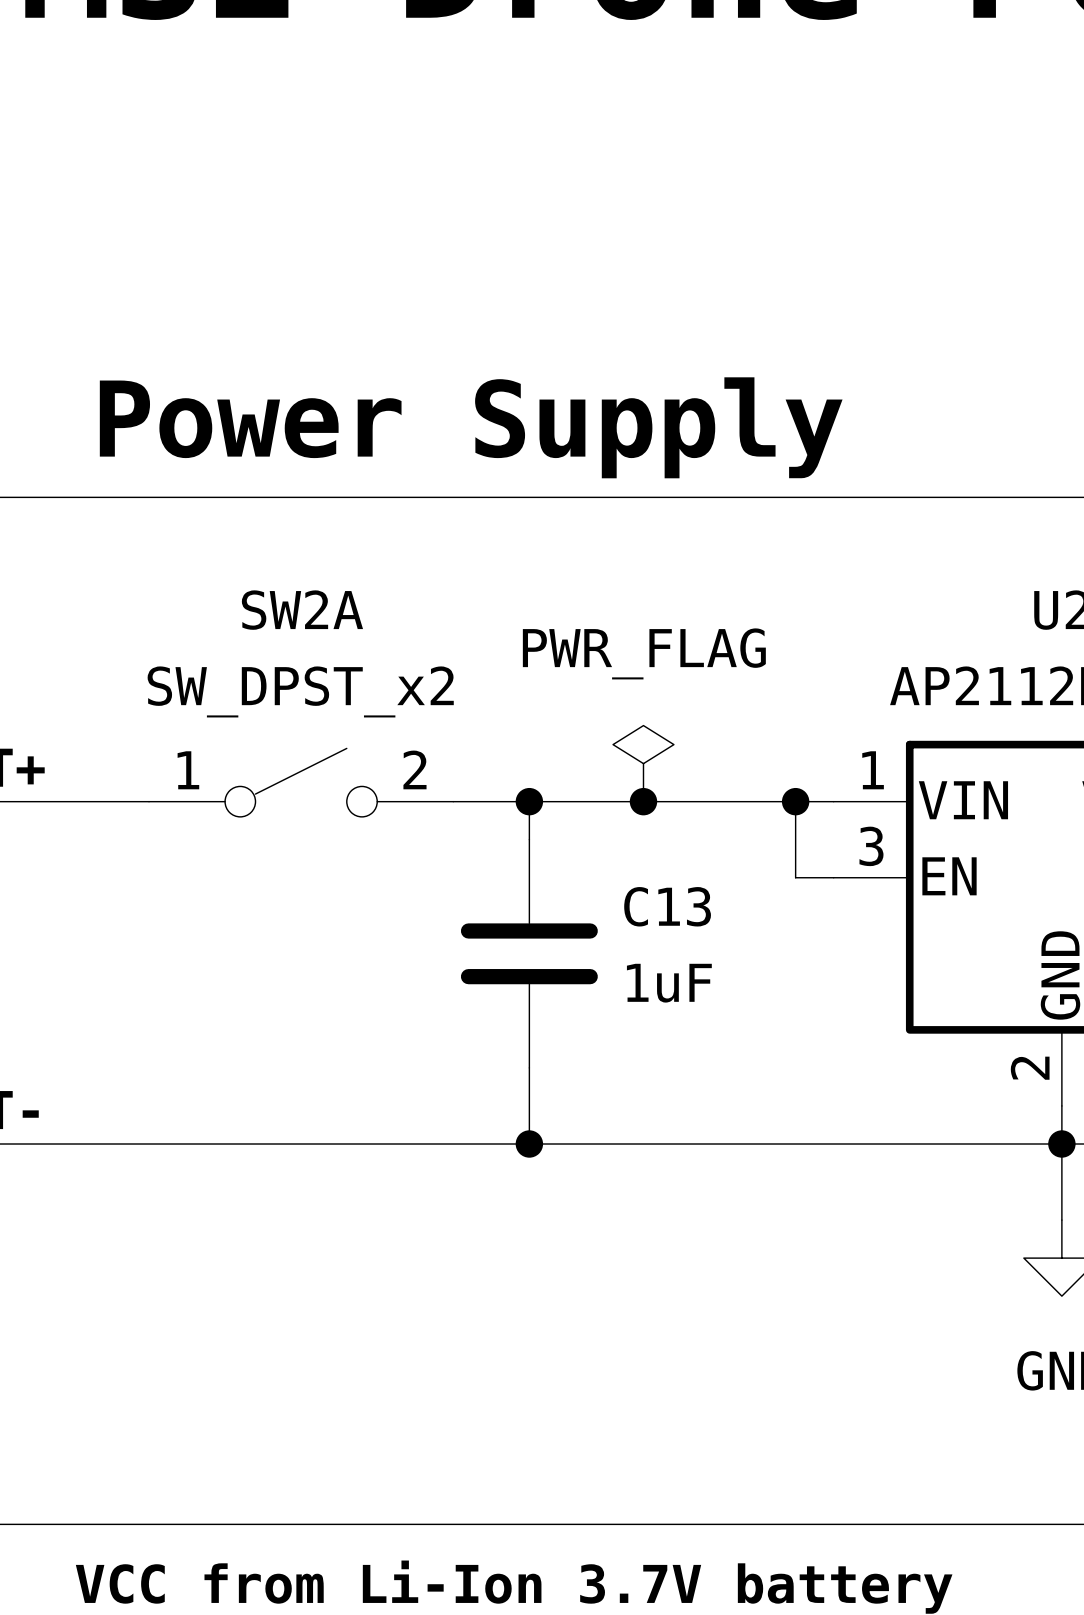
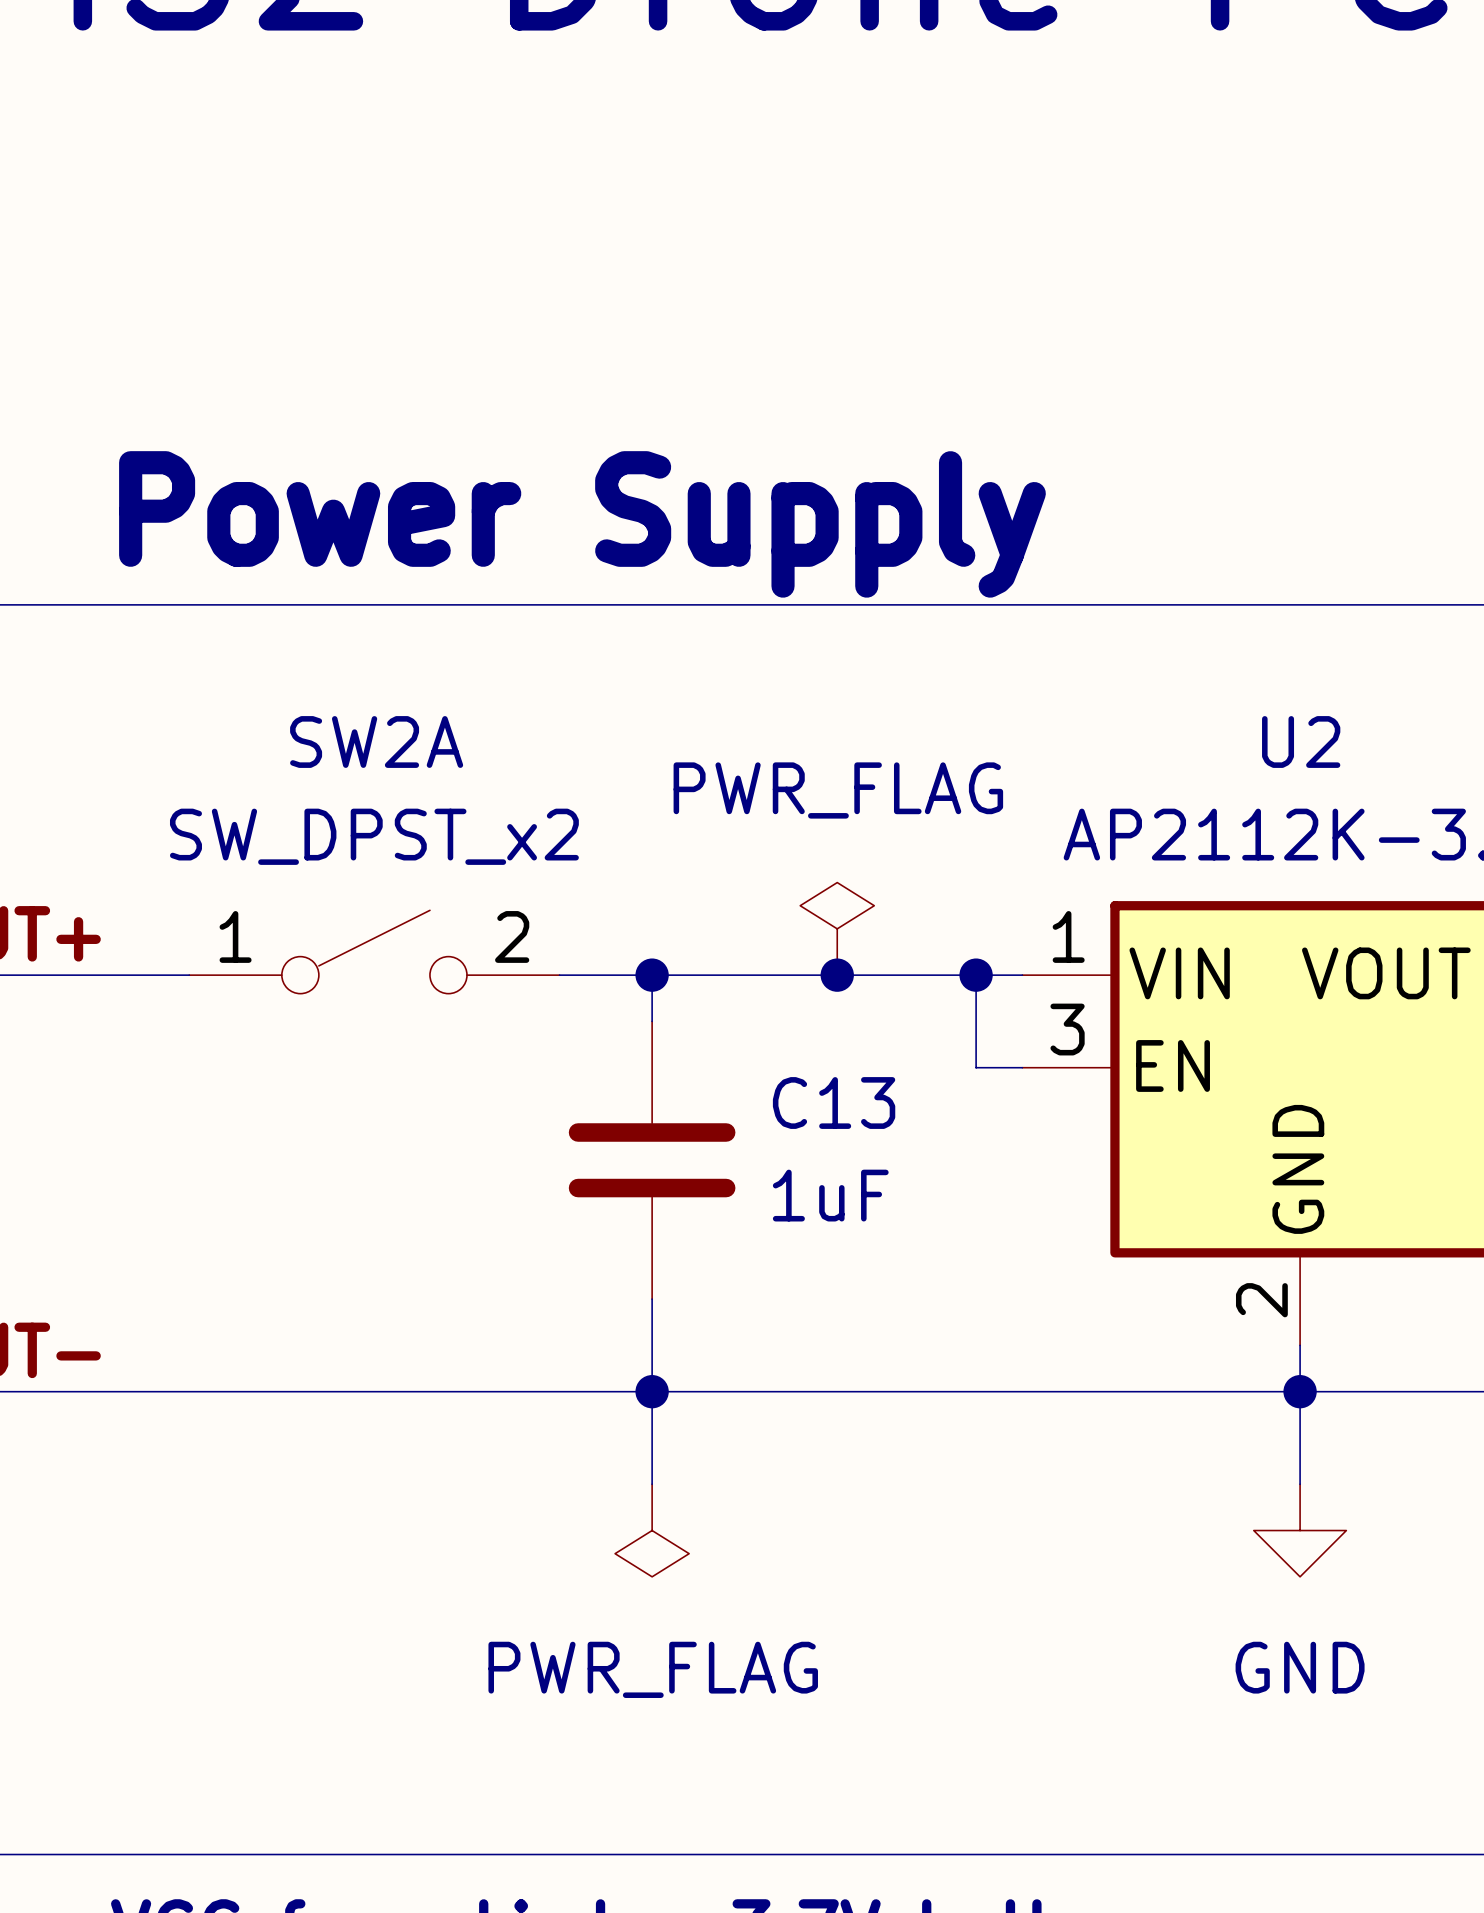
power symbol position: PWR_FLAG (643, 763) -> PWR_FLAG (837, 928)
junction position: (643, 801) -> (837, 975)
wire: none -> (652, 1391) (652, 1484)
power symbol: none -> PWR_FLAG (652, 1530)

